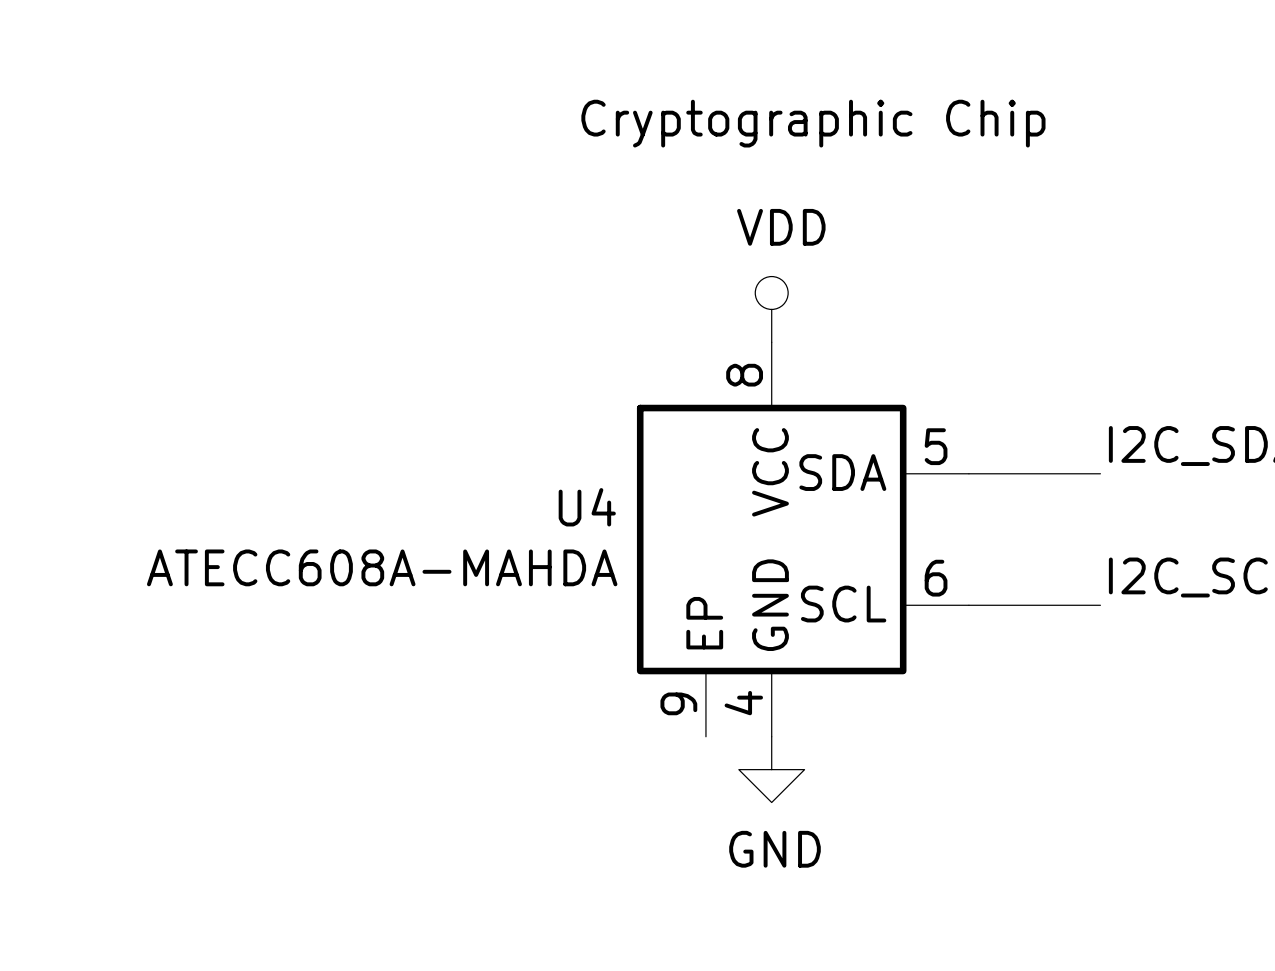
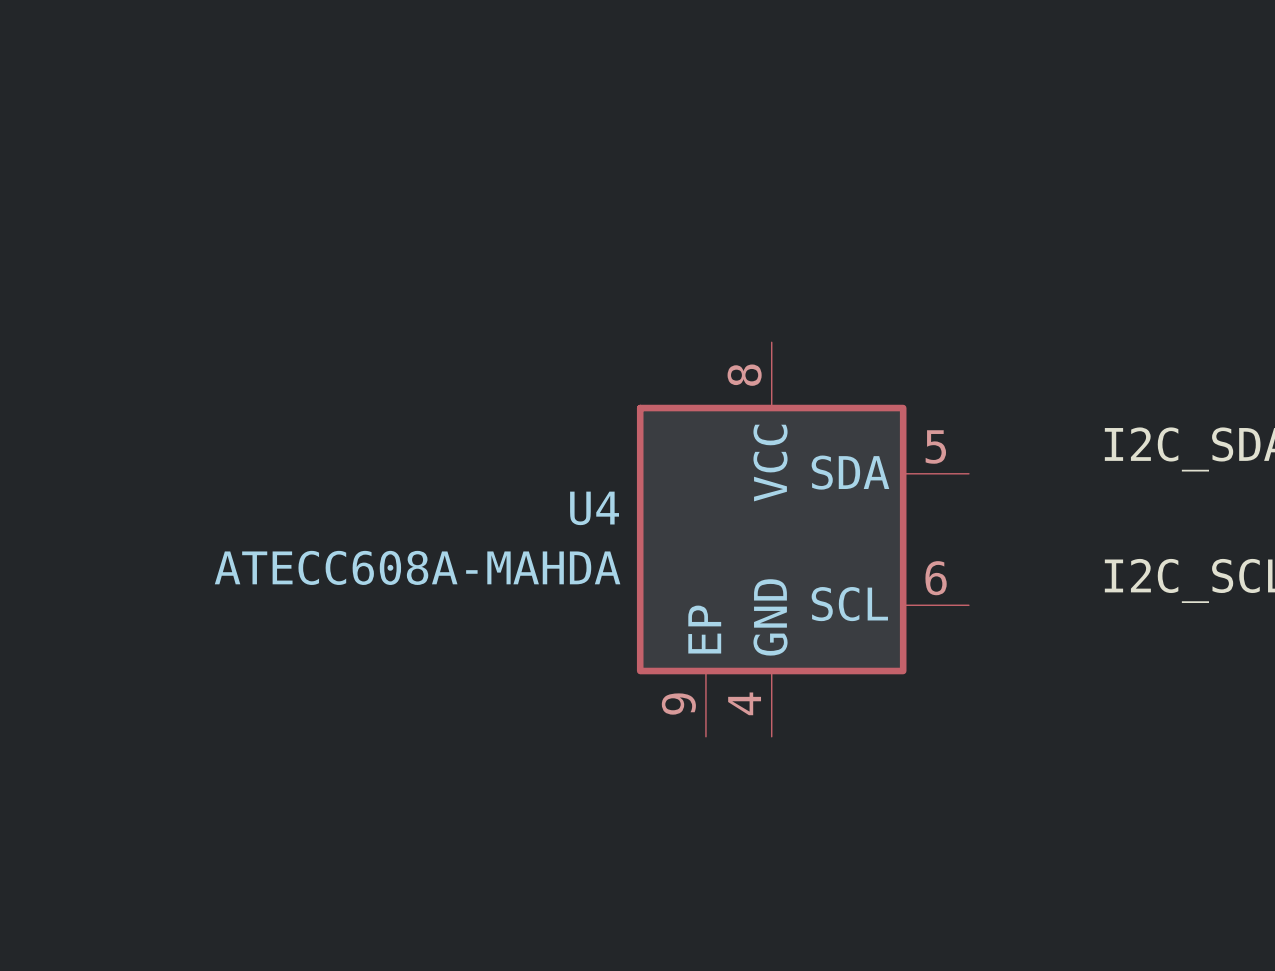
text: Cryptographic Chip (813, 123) -> none
power symbol: VDD (771, 309) -> none
wire: (968, 473) (1100, 473) -> none
wire: (968, 605) (1100, 605) -> none
power symbol: GND (771, 769) -> none

